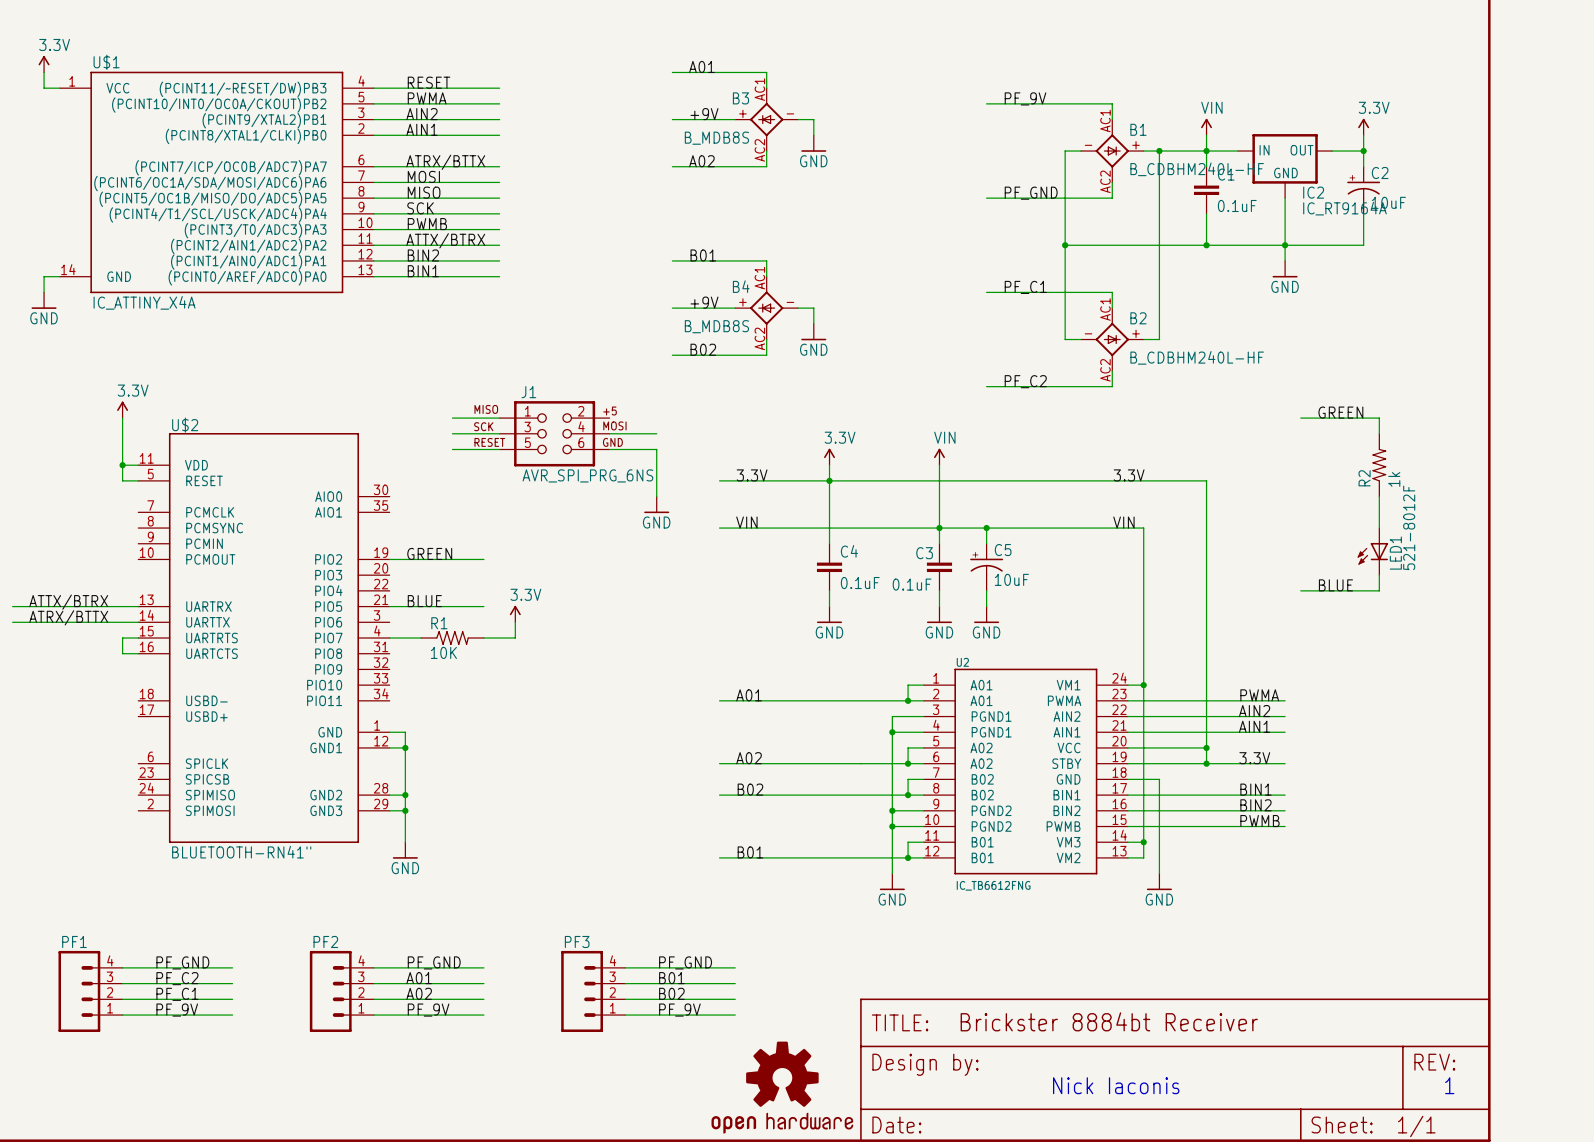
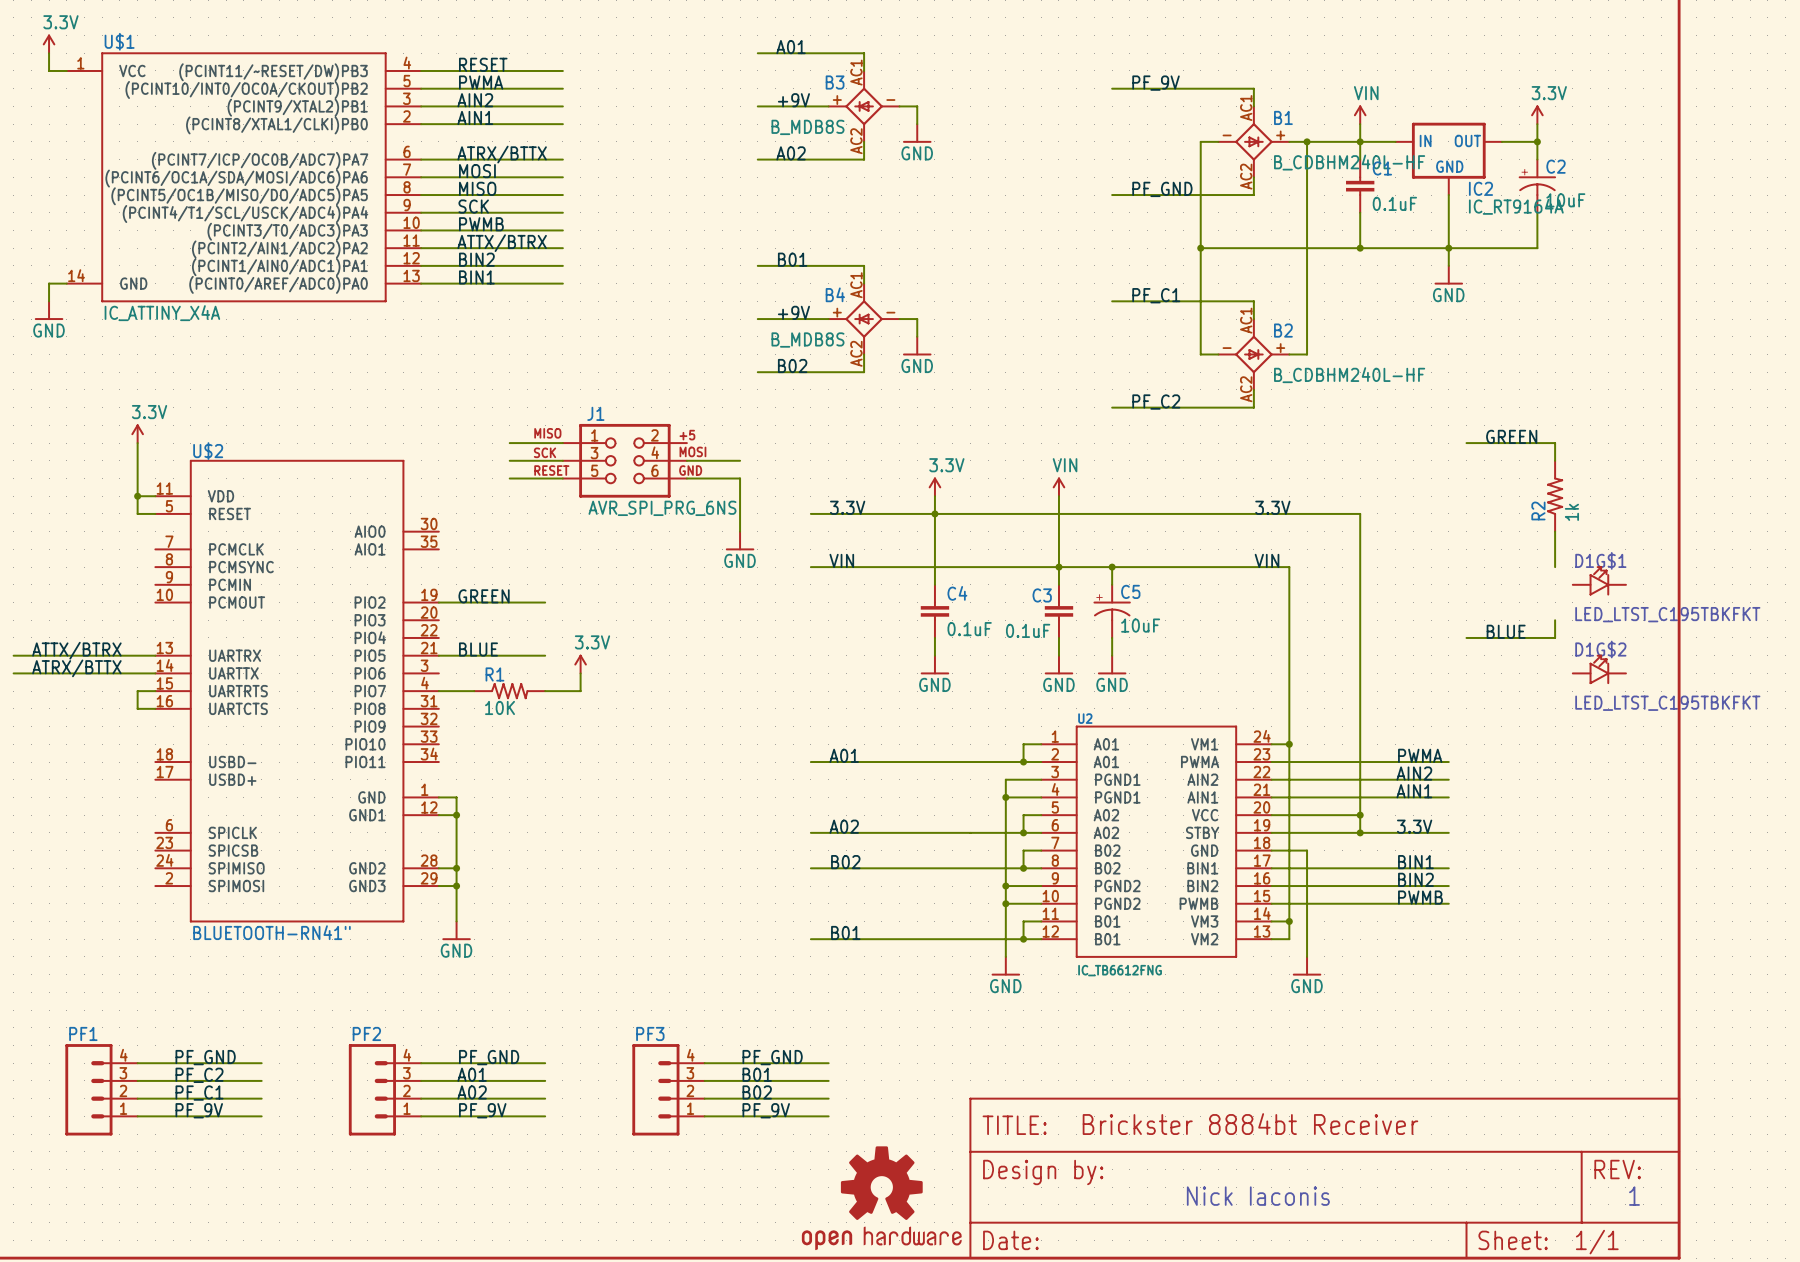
D1G$1: none -> LED_LTST_C195TBKFKT (1599, 580)
LED1: 521-8012F (1372, 551) -> none
D1G$2: none -> LED_LTST_C195TBKFKT (1599, 669)

